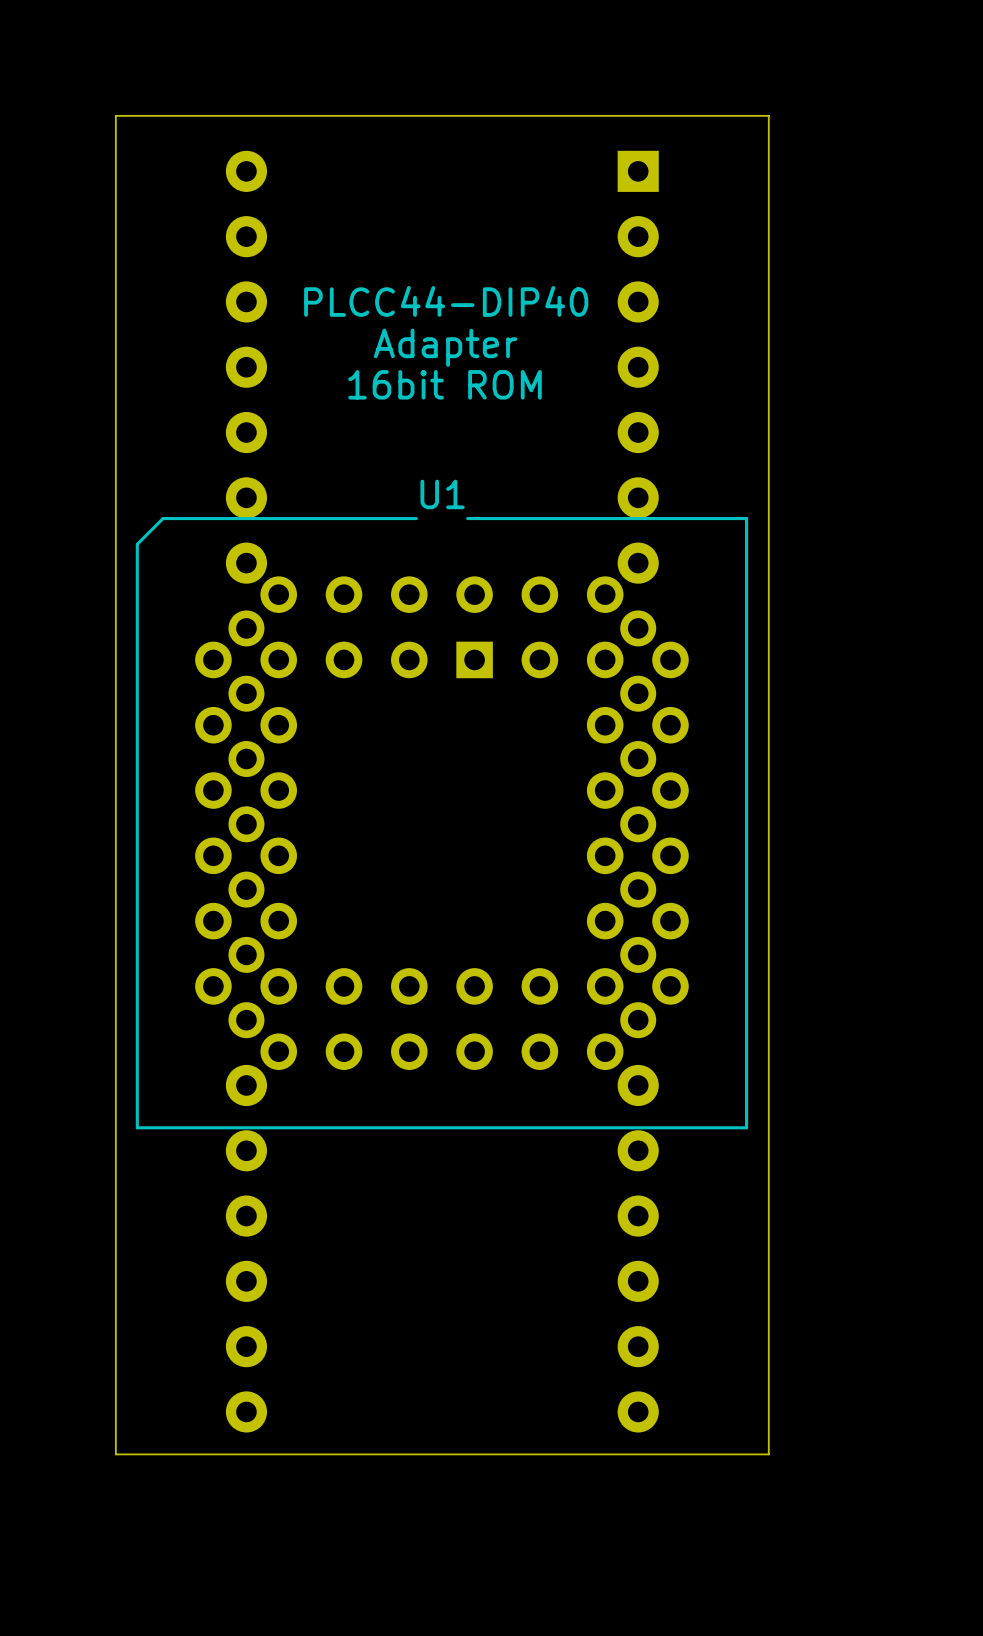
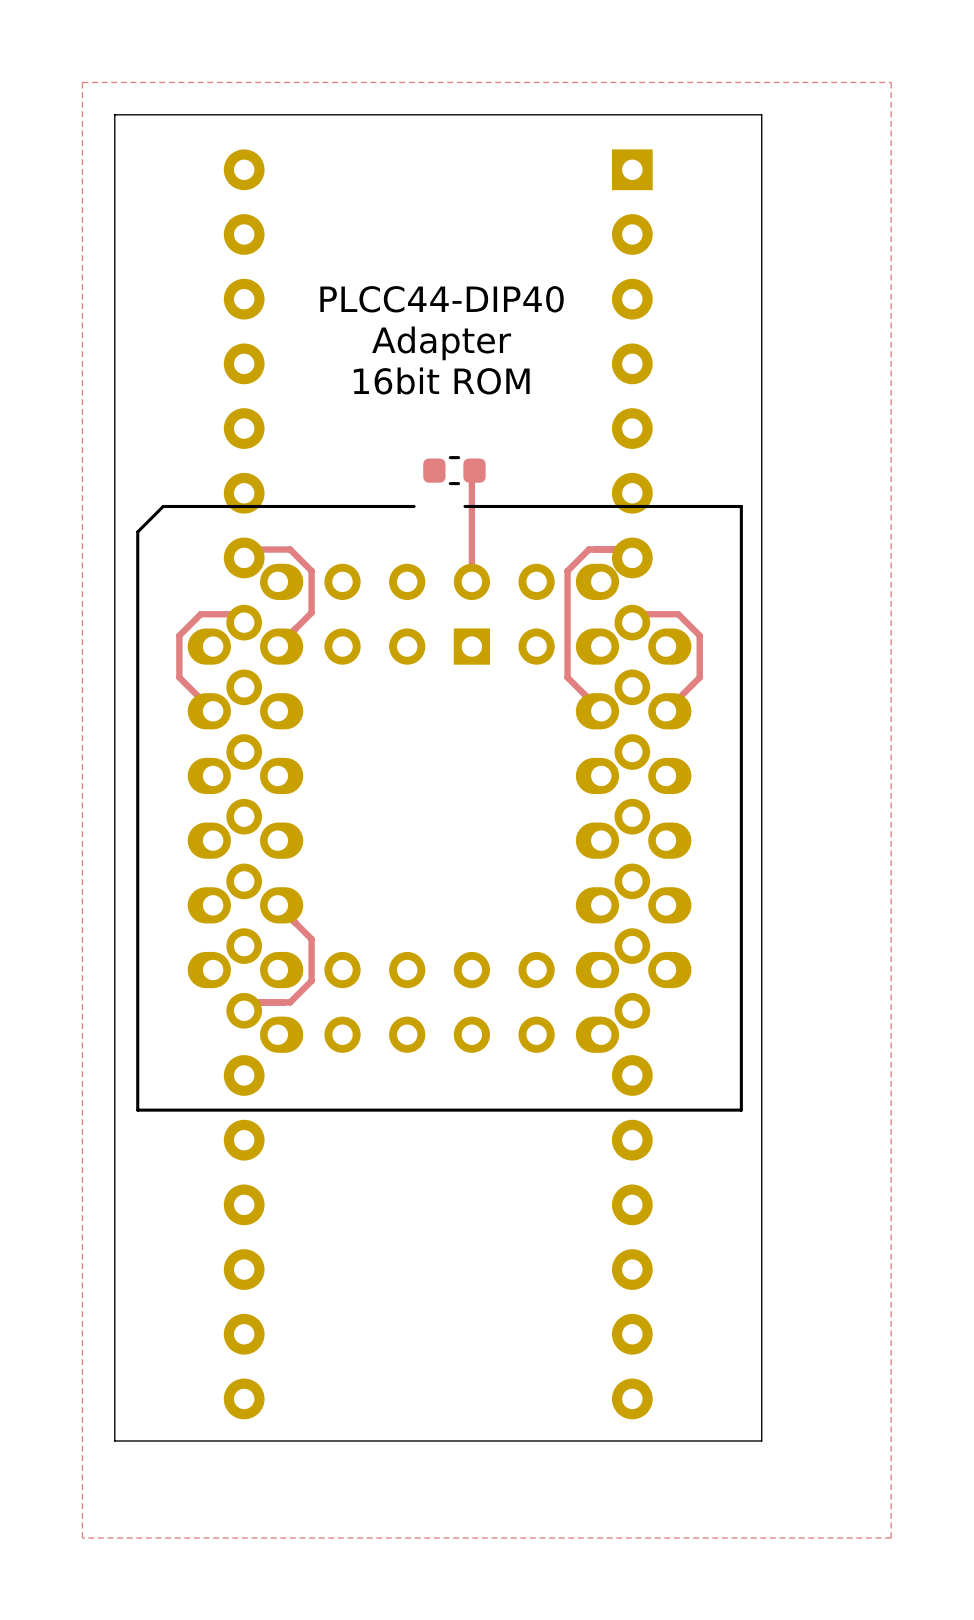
zone outline: none -> (82, 82) (82, 1538) (891, 1538) (891, 82) (82, 82)
part: none -> (454, 470)
track: none -> (474, 470) (471, 473) (471, 581) (474, 579)
track: none -> (245, 549) (290, 549) (311, 570) (311, 612) (277, 646)
track: none -> (633, 549) (588, 549) (567, 570) (567, 677) (601, 711)
track: none -> (245, 614) (200, 614) (179, 635) (179, 677) (213, 711)
track: none -> (633, 614) (678, 614) (699, 635) (699, 677) (665, 711)
part: none -> (439, 808)
U1: (441, 823) -> none
track: none -> (277, 905) (311, 939) (311, 980) (290, 1002) (245, 1002)

